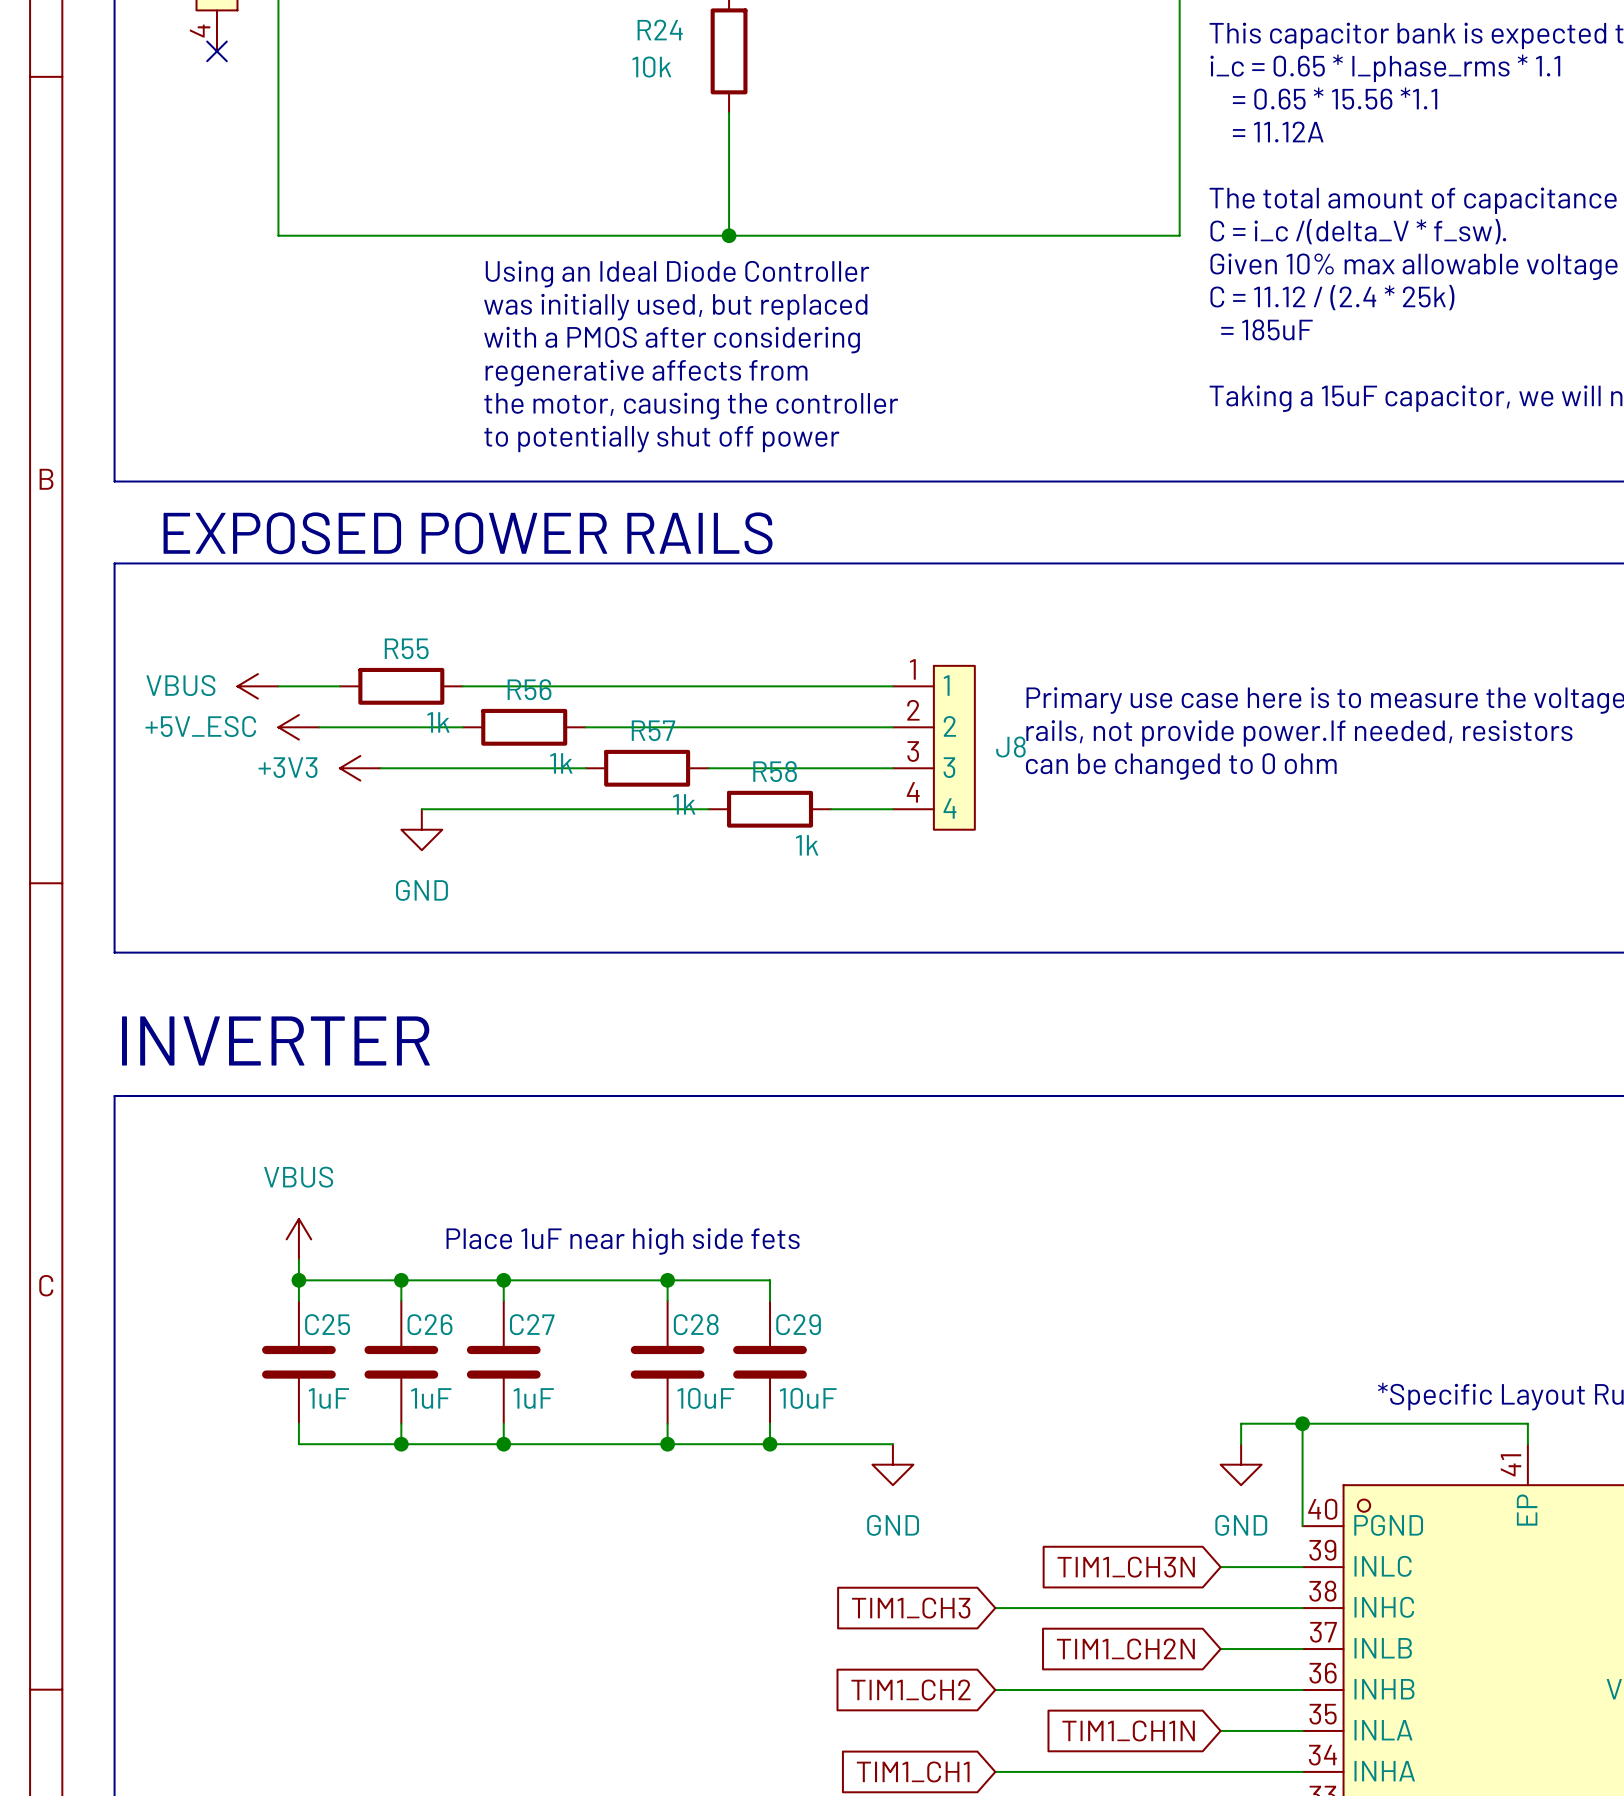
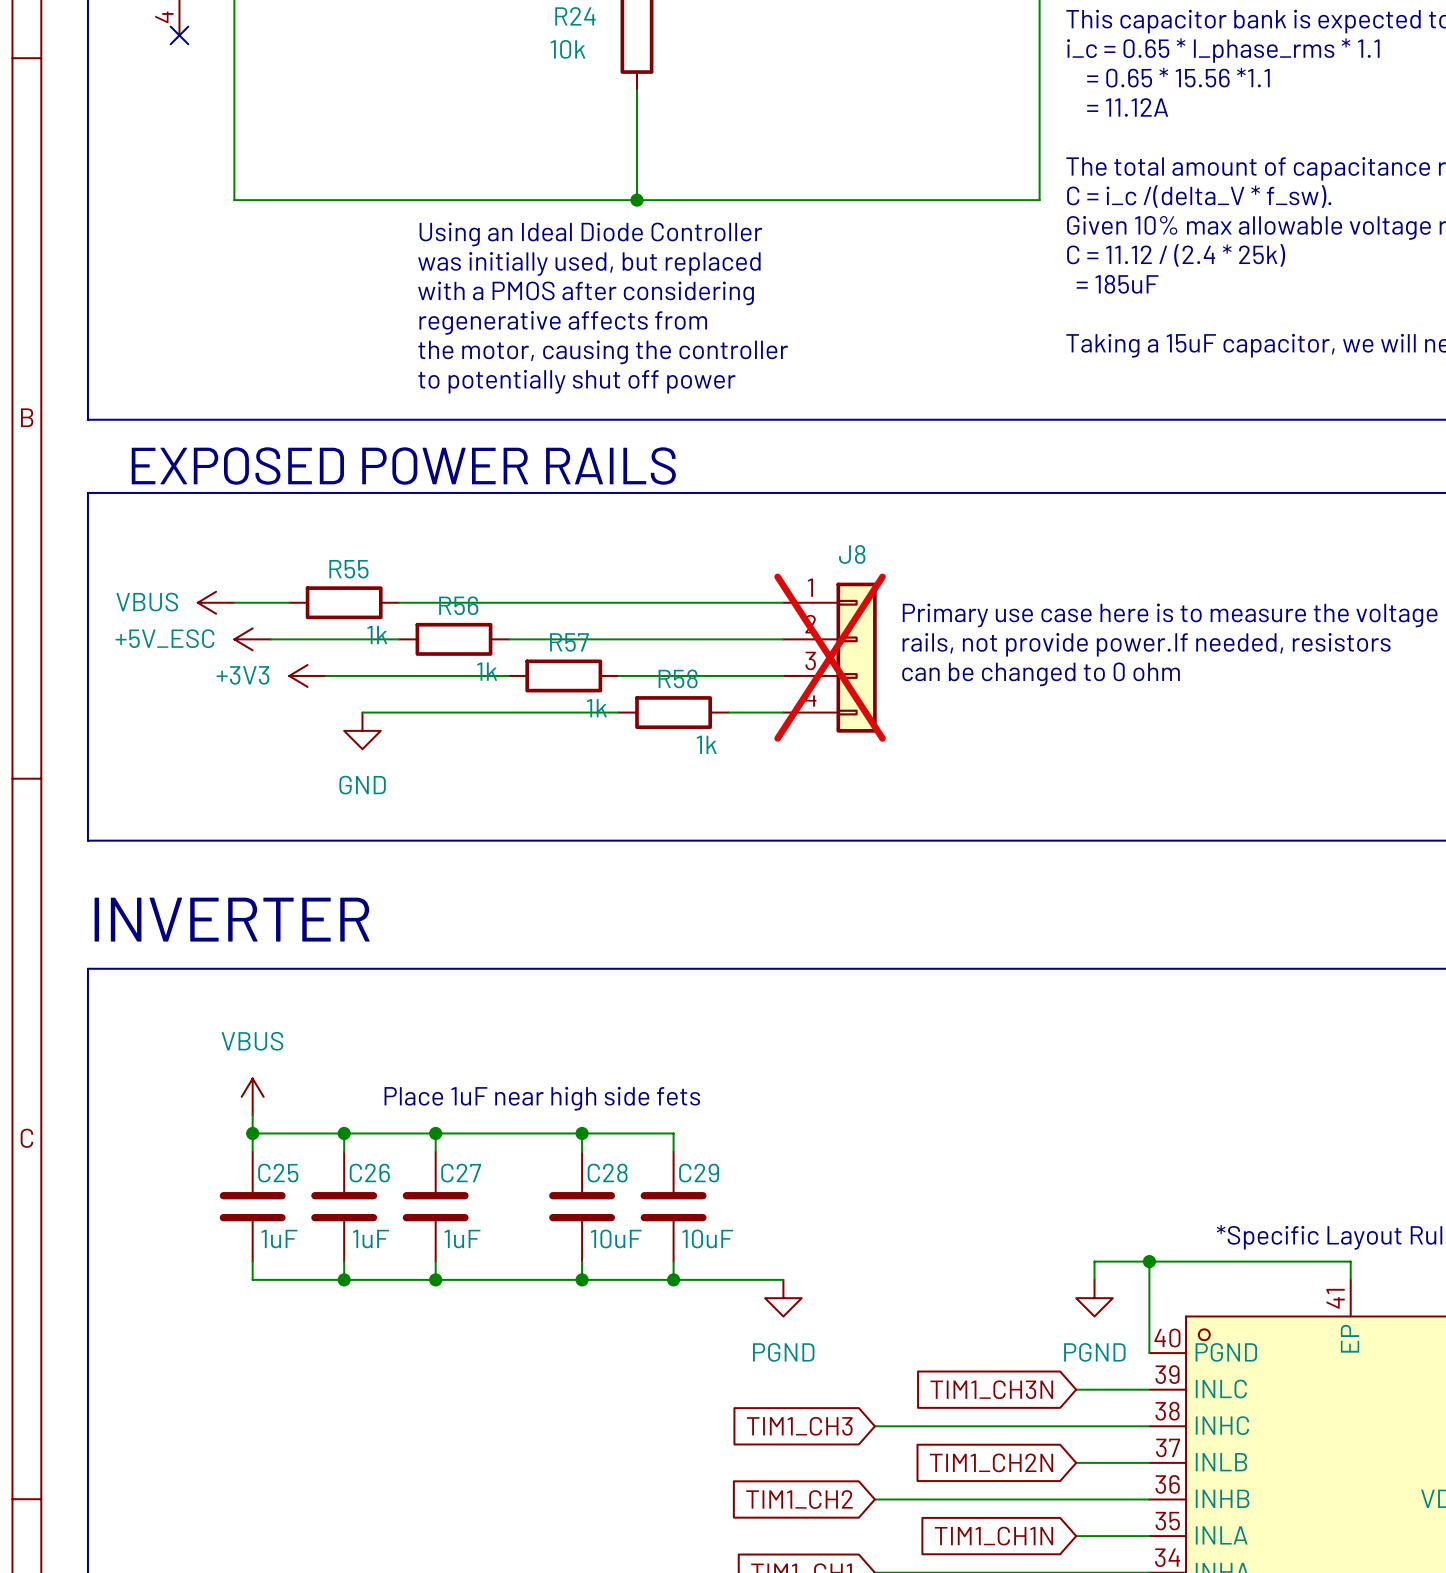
J8 symbol: [892, 665, 975, 830] -> [783, 582, 877, 733]
J8 name position: J8 (1010, 746) -> J8 (852, 554)
J8 do-not-place cross: none -> (830, 657)
power symbol: GND (892, 1464) -> PGND (783, 1298)
power symbol: GND (1241, 1464) -> PGND (1094, 1298)

